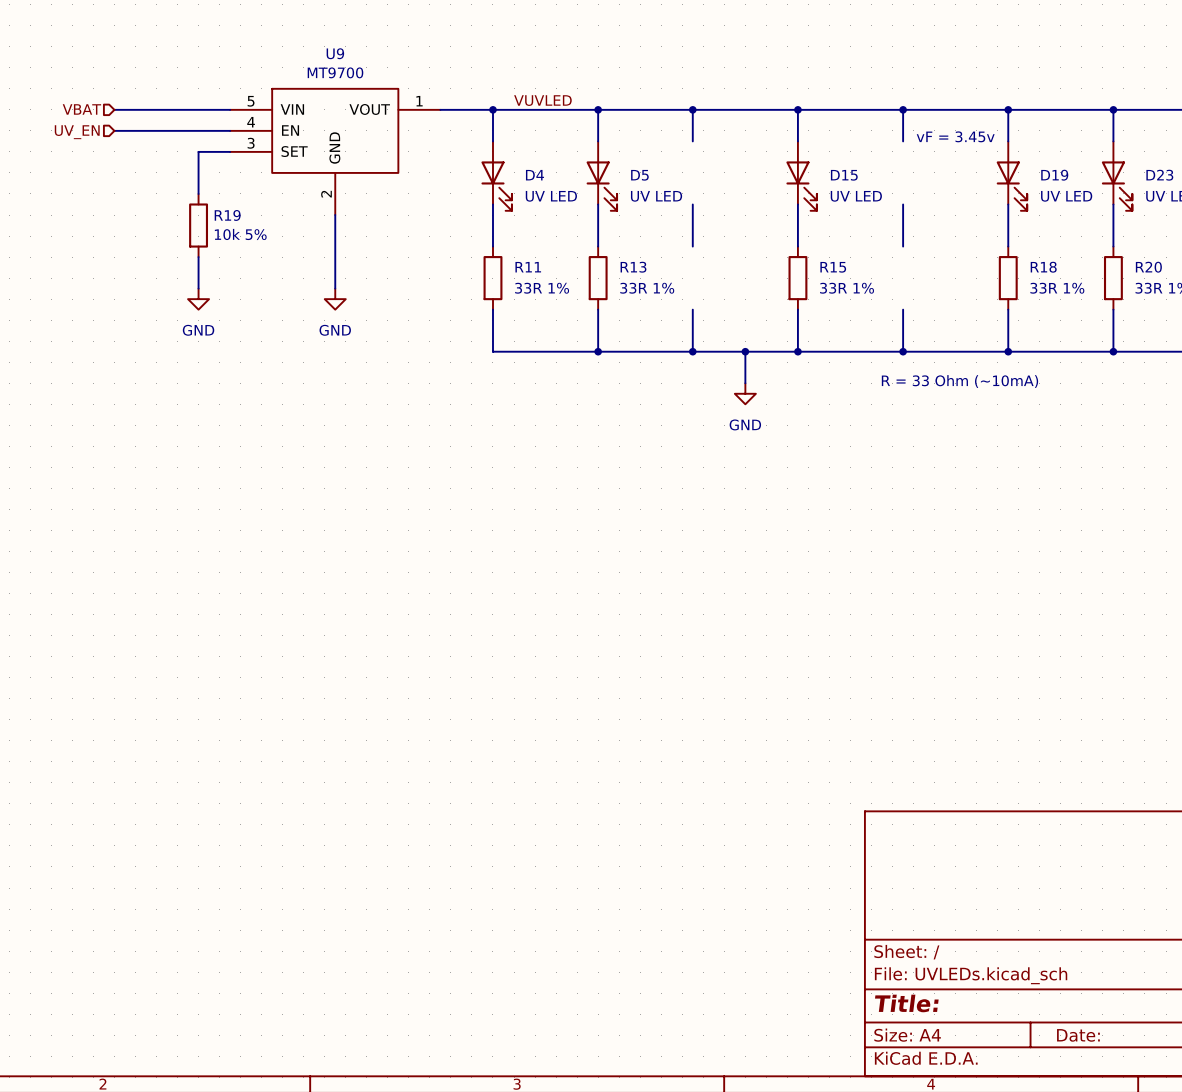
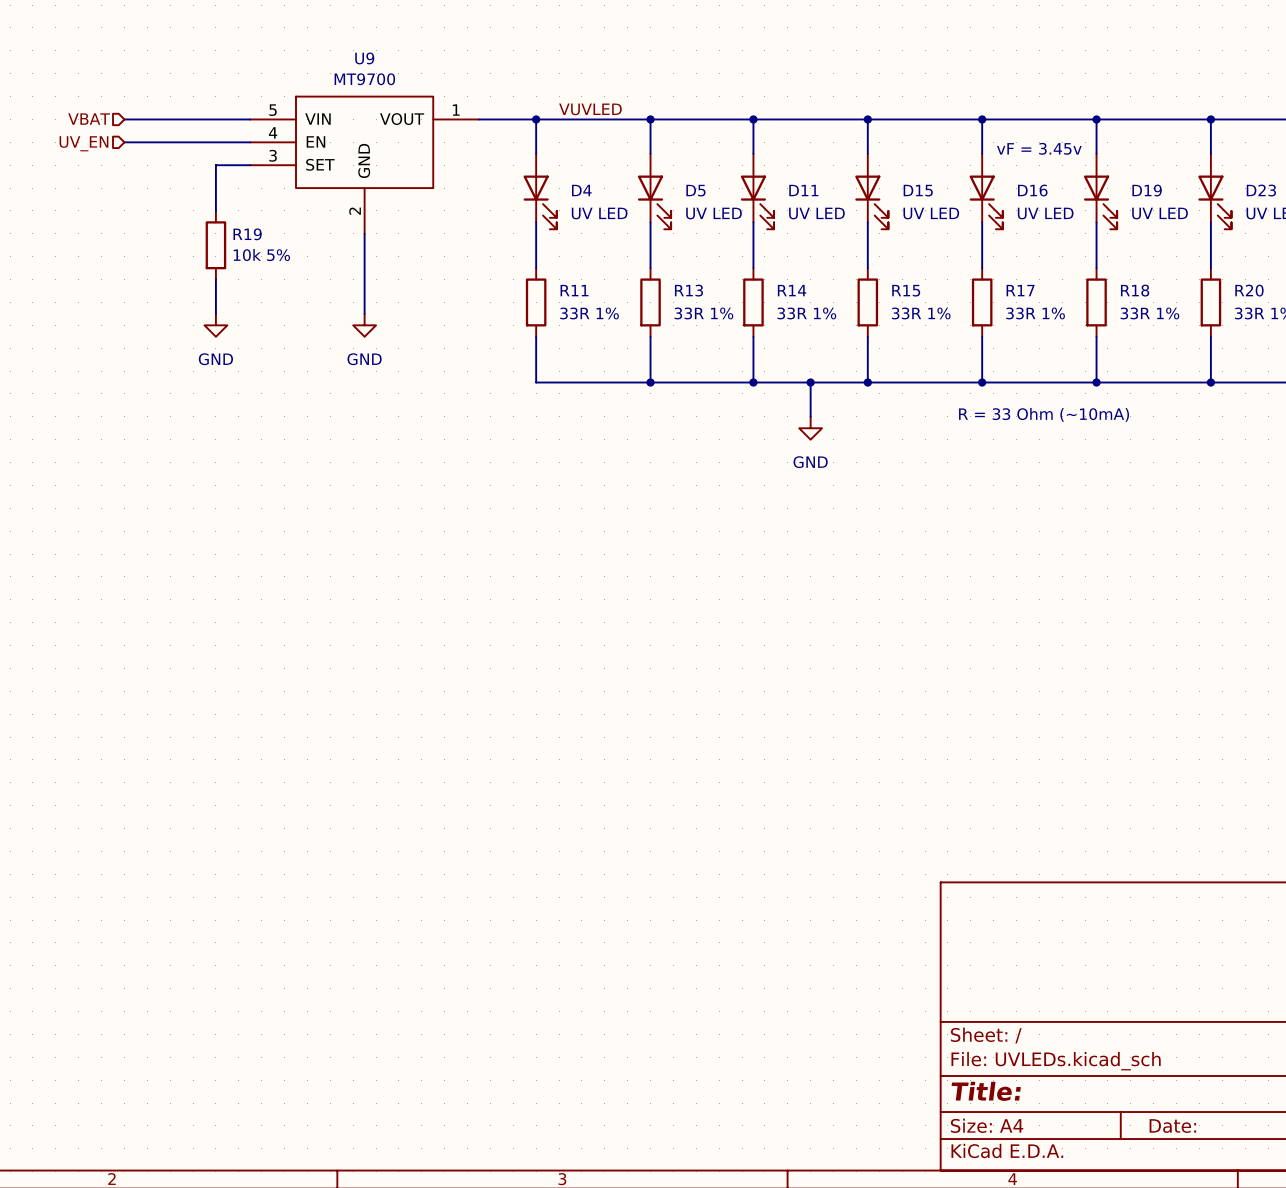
D11: none -> UV LED (757, 191)
D16: none -> UV LED (986, 191)
R14: none -> 33R 1% (753, 302)
R17: none -> 33R 1% (982, 302)

